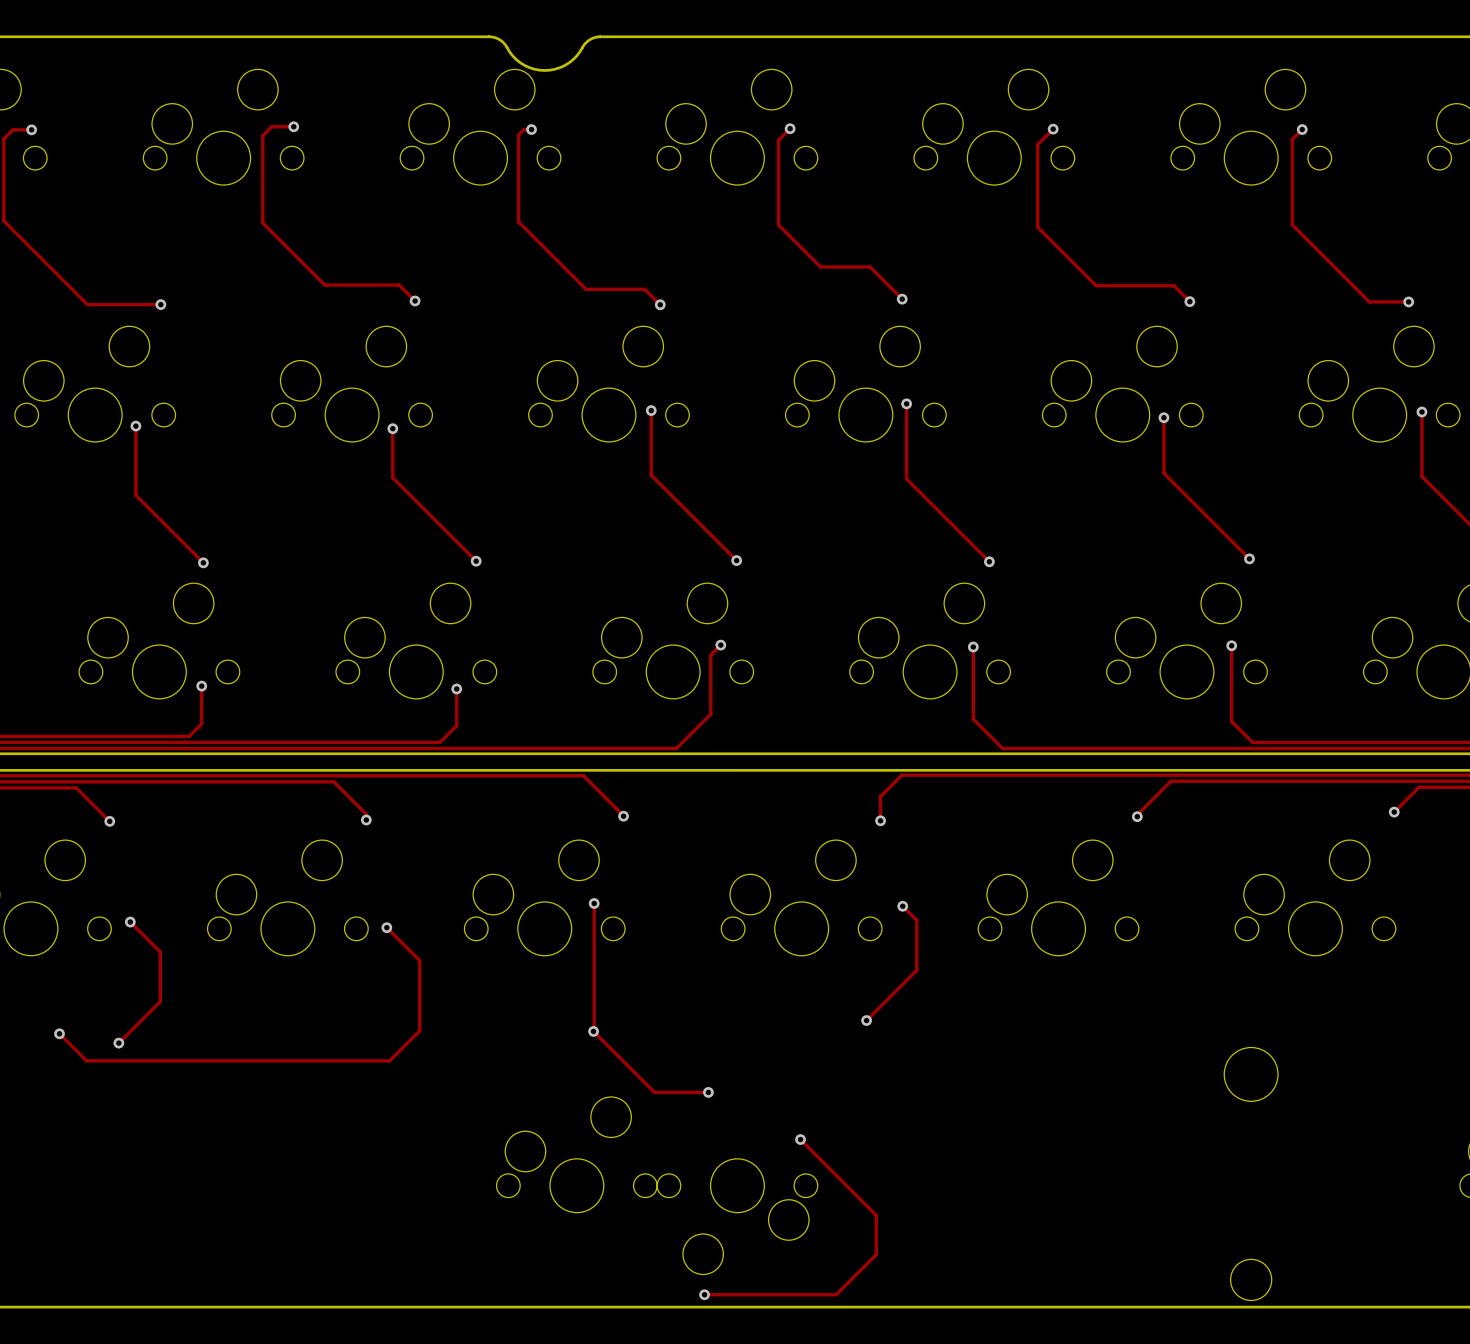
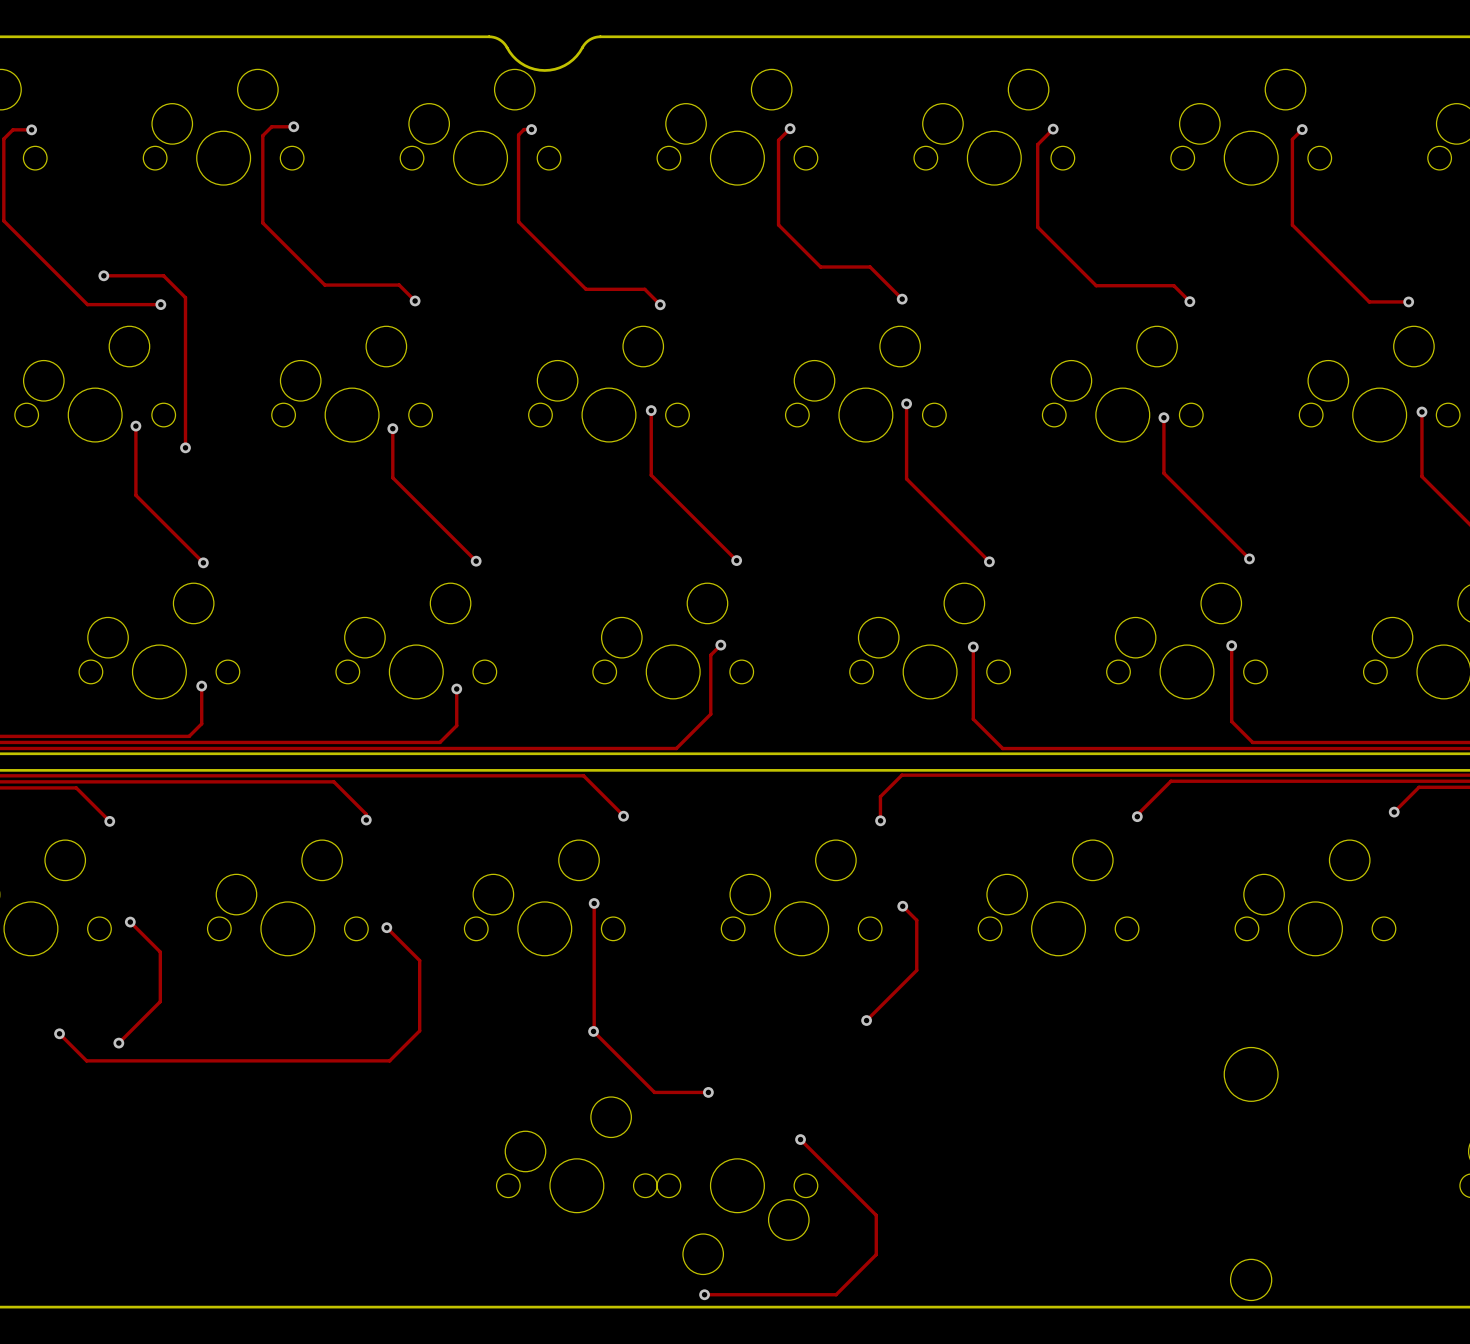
track: none -> (103, 275) (163, 275) (185, 297) (185, 447)
via: none -> (103, 275)
via: none -> (185, 447)

